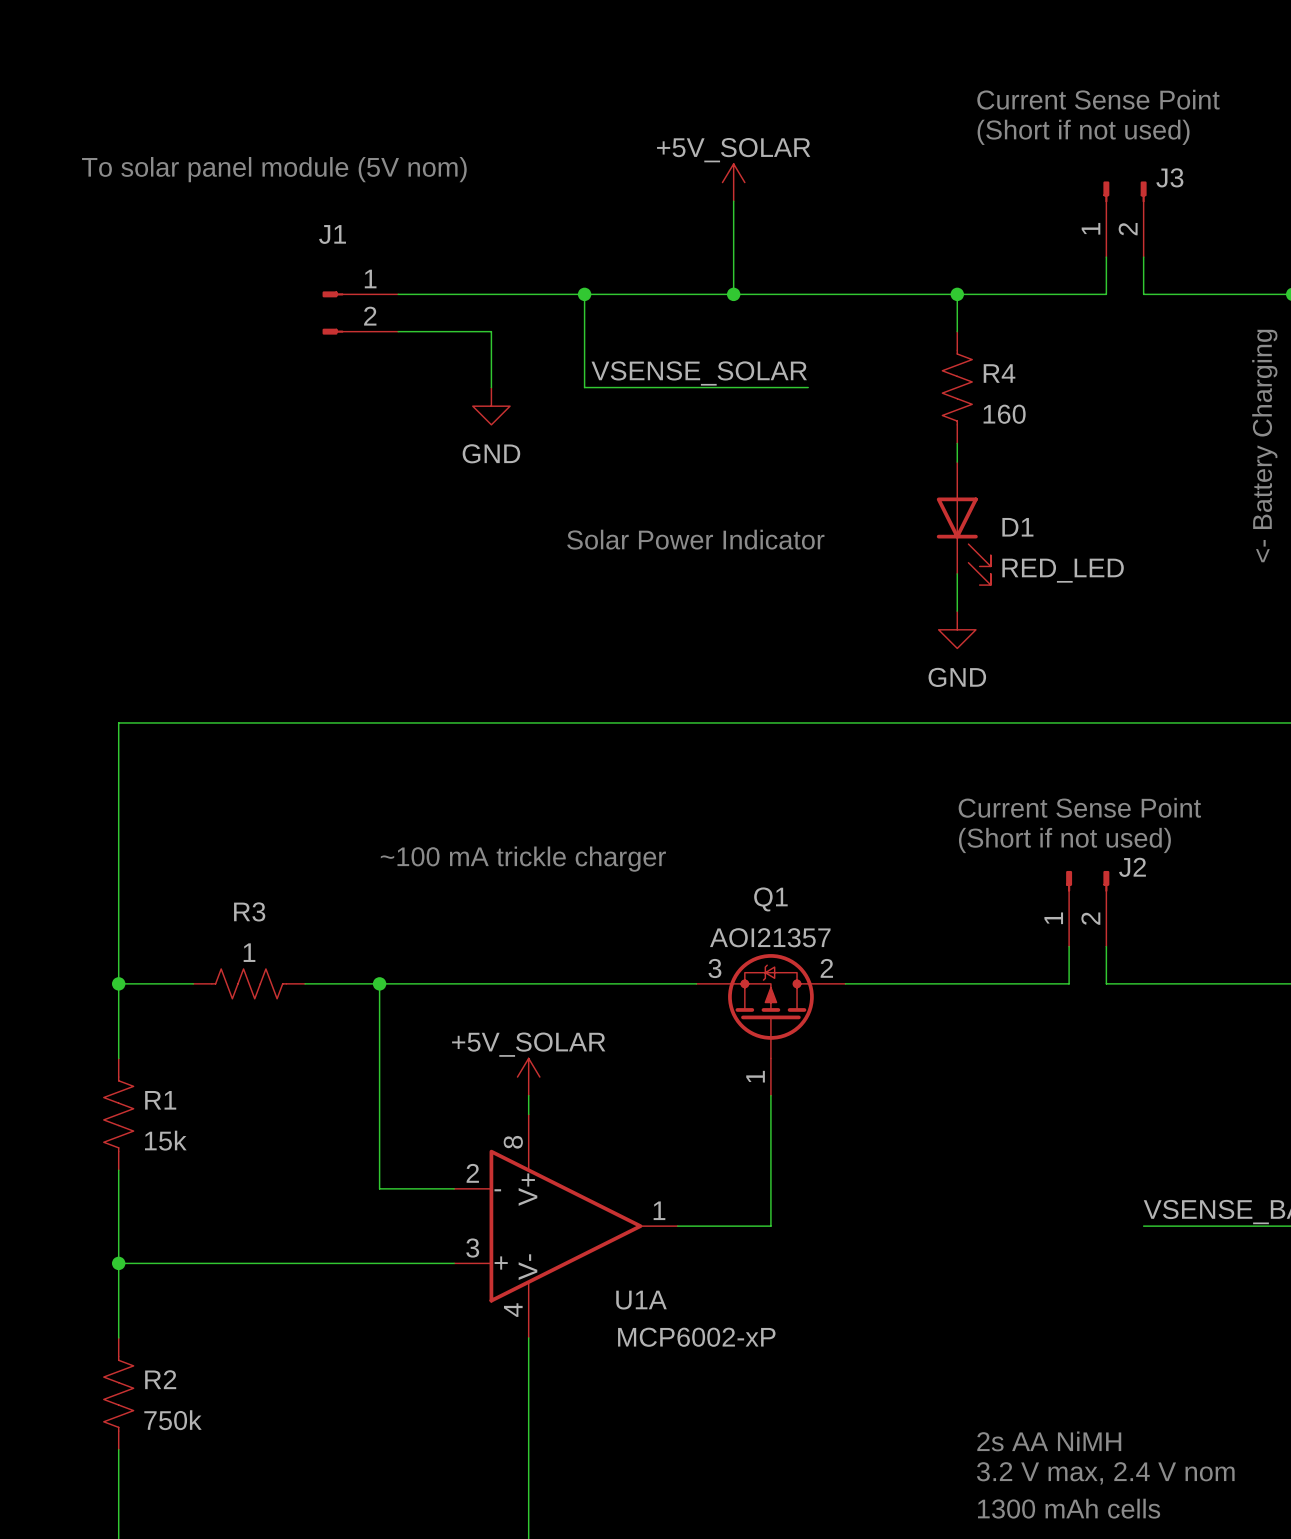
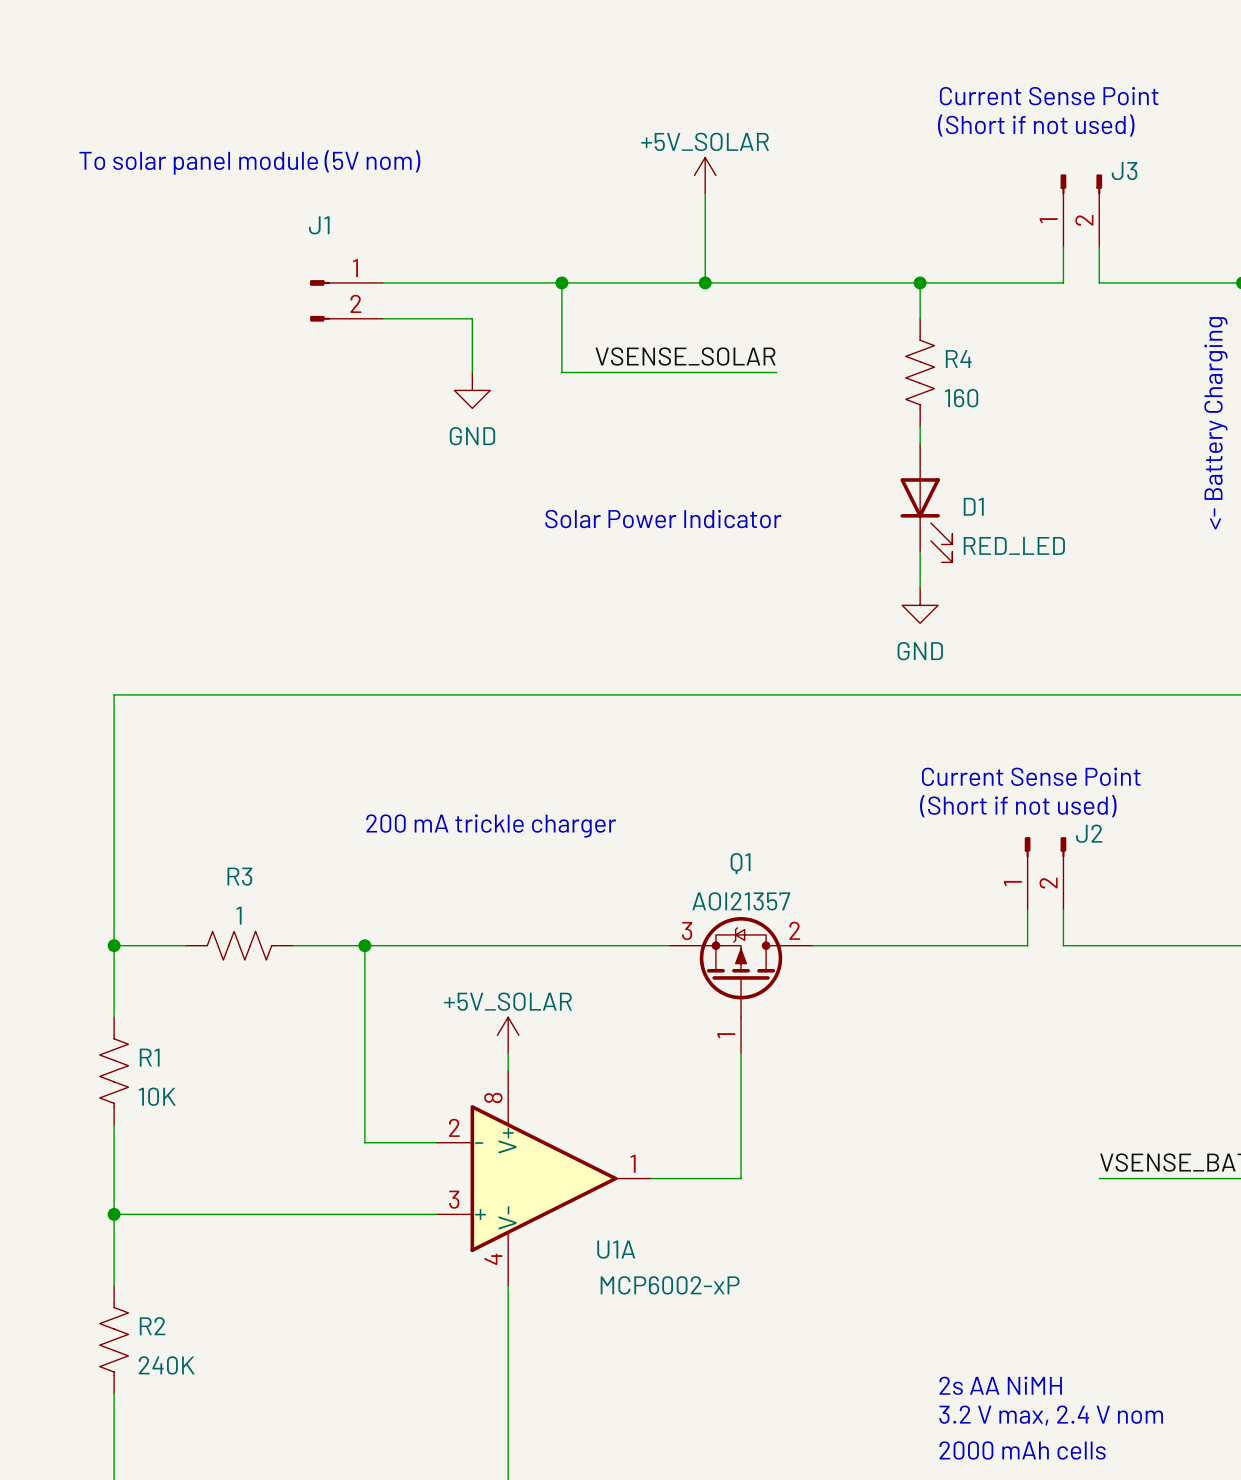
text: ~100 mA trickle charger (523, 859) -> 200 mA trickle charger (491, 825)
R1 value: 15k (165, 1140) -> 10K (157, 1096)
R2 value: 750k (173, 1420) -> 240K (166, 1365)
text: 1300 mAh cells (1069, 1508) -> 2000 mAh cells (1022, 1450)

